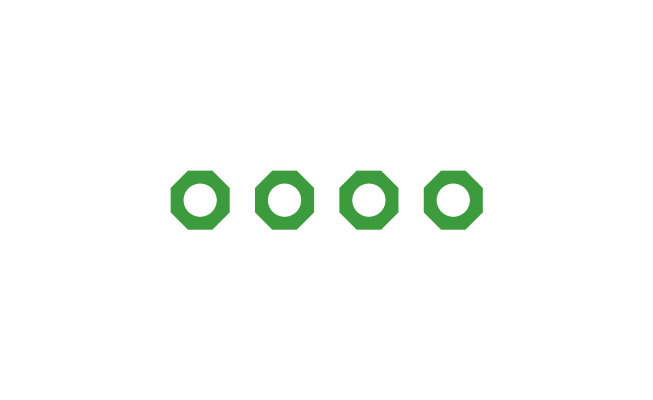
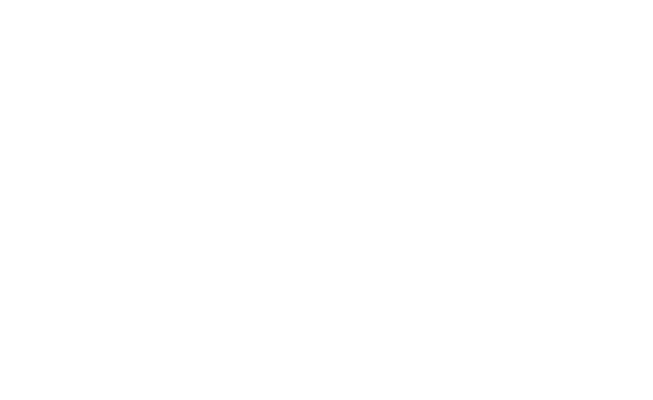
part: (326, 200) -> none

